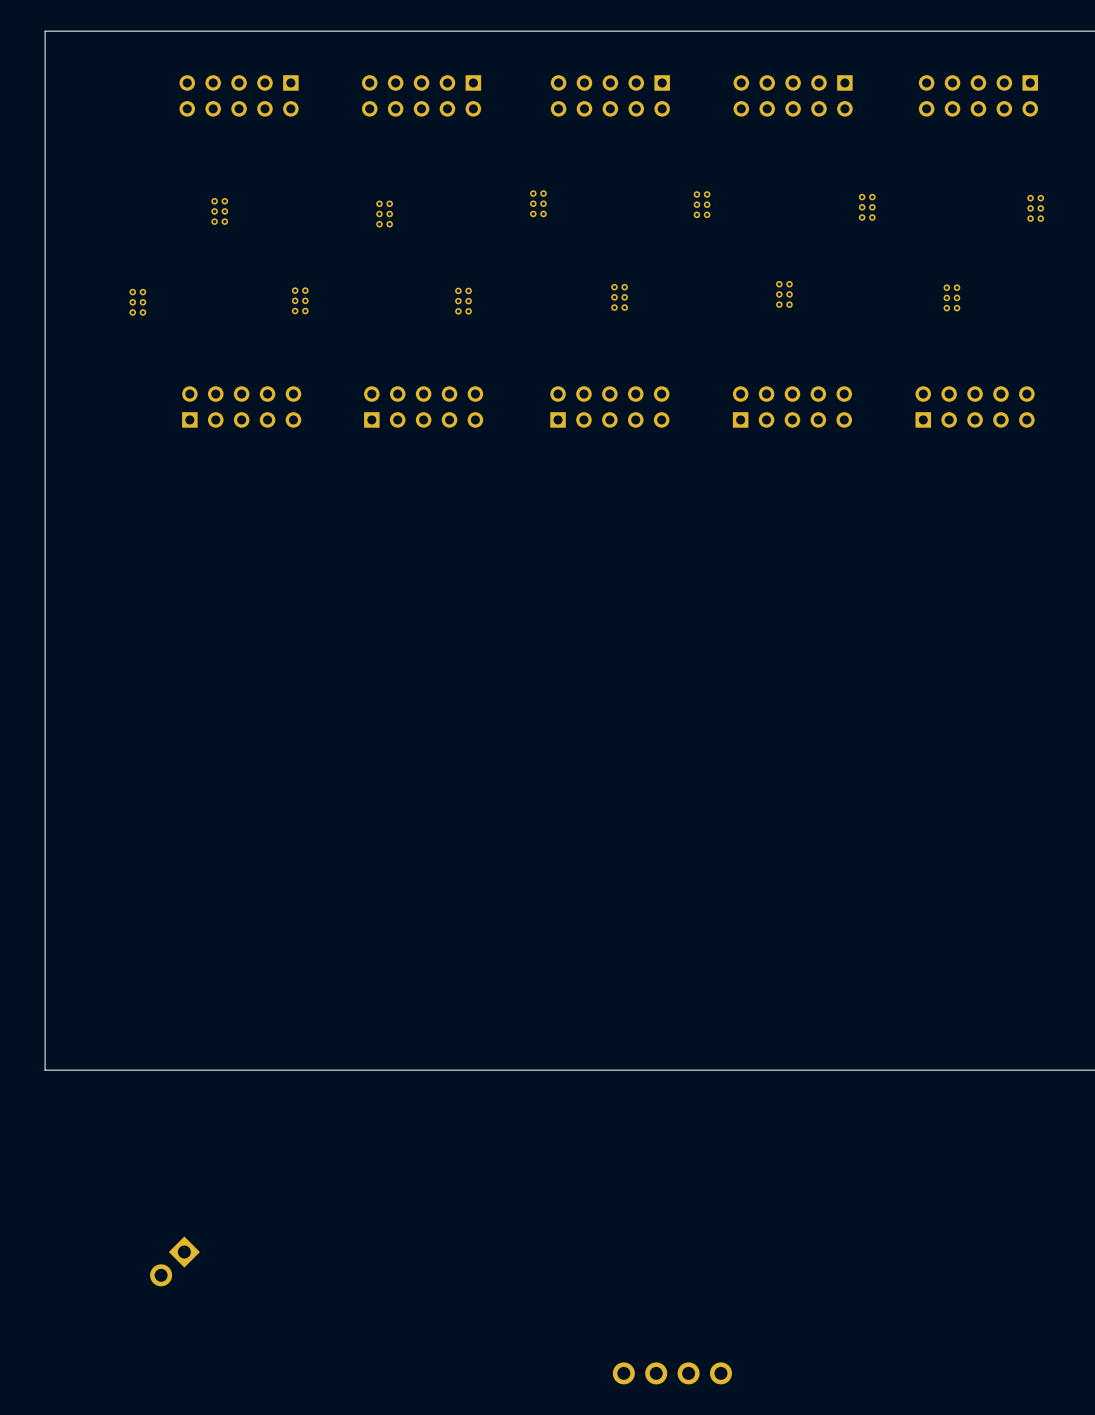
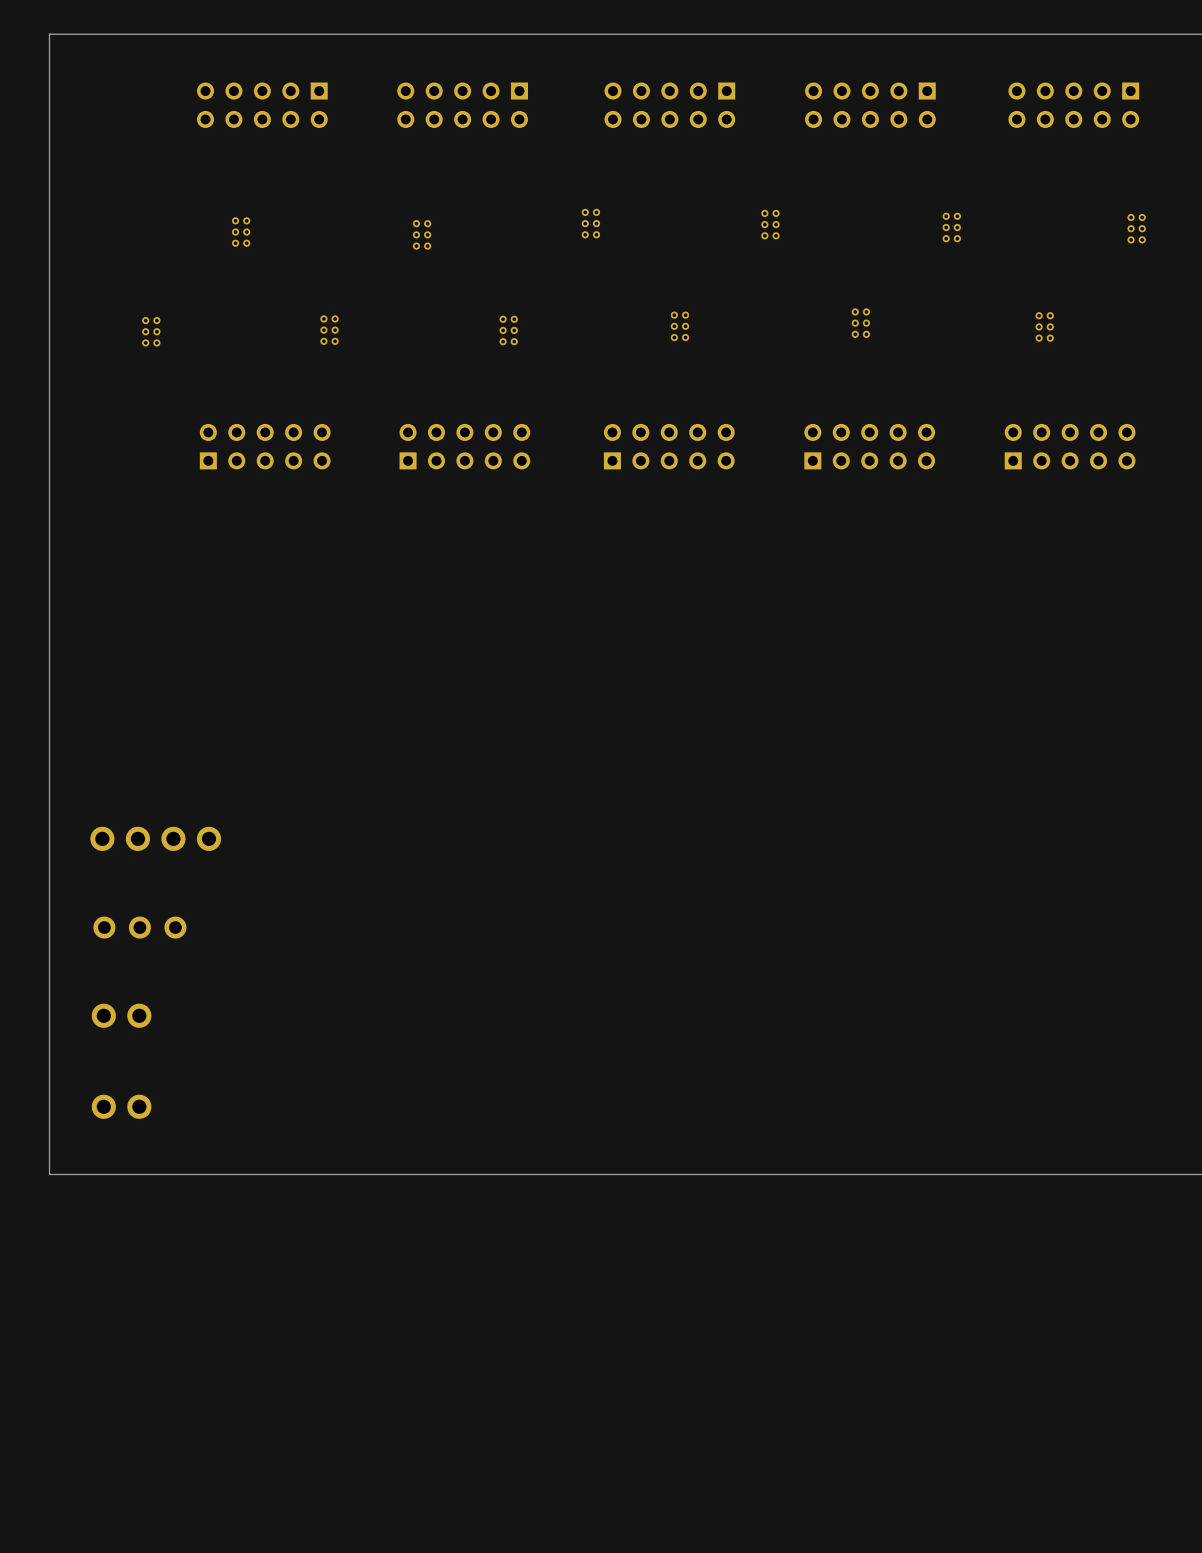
part: none -> (155, 838)
part: none -> (139, 927)
part: none -> (121, 1015)
part: none -> (121, 1106)
part: (175, 1261) -> none
part: (672, 1373) -> none

